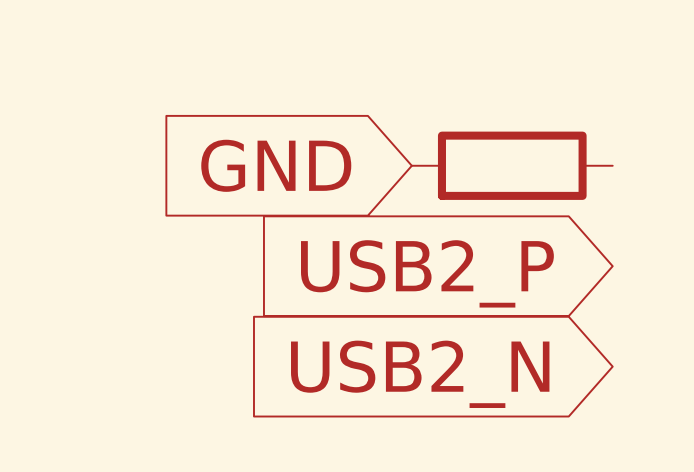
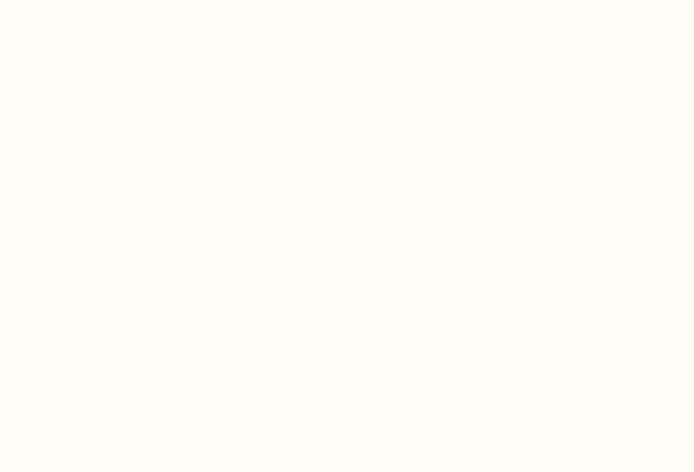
global label: GND (276, 165) -> none
part: (512, 165) -> none
global label: USB2_P (427, 273) -> none
global label: USB2_N (420, 374) -> none

